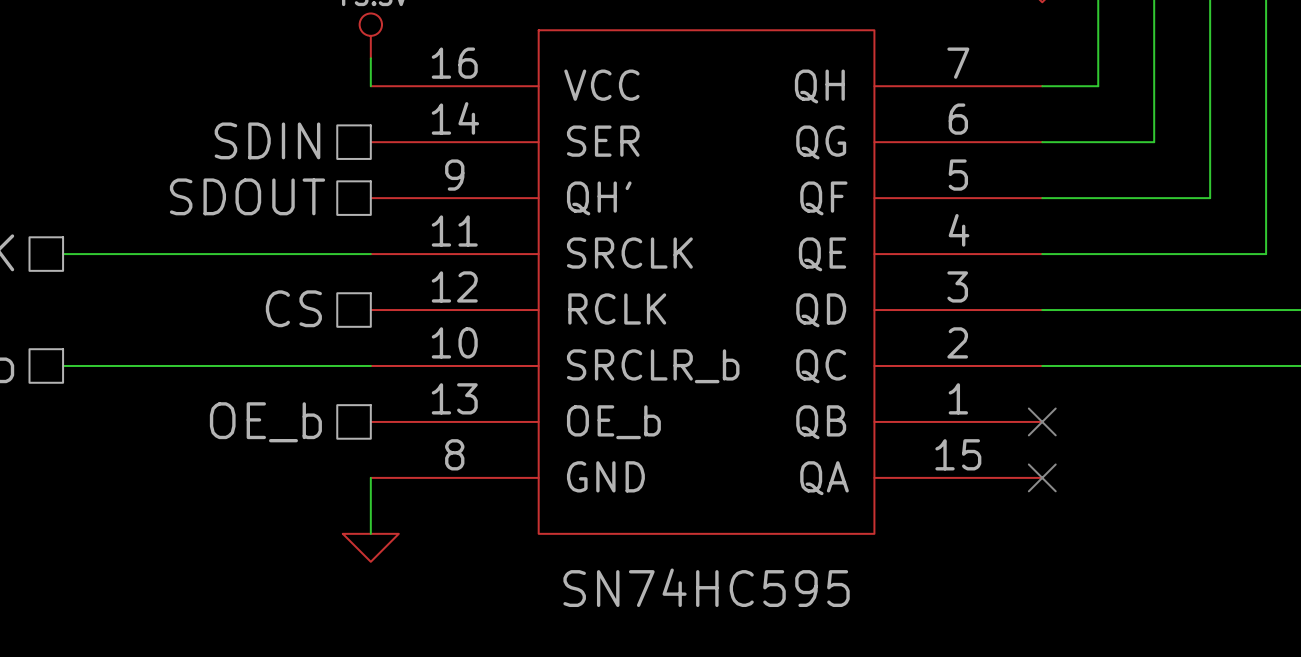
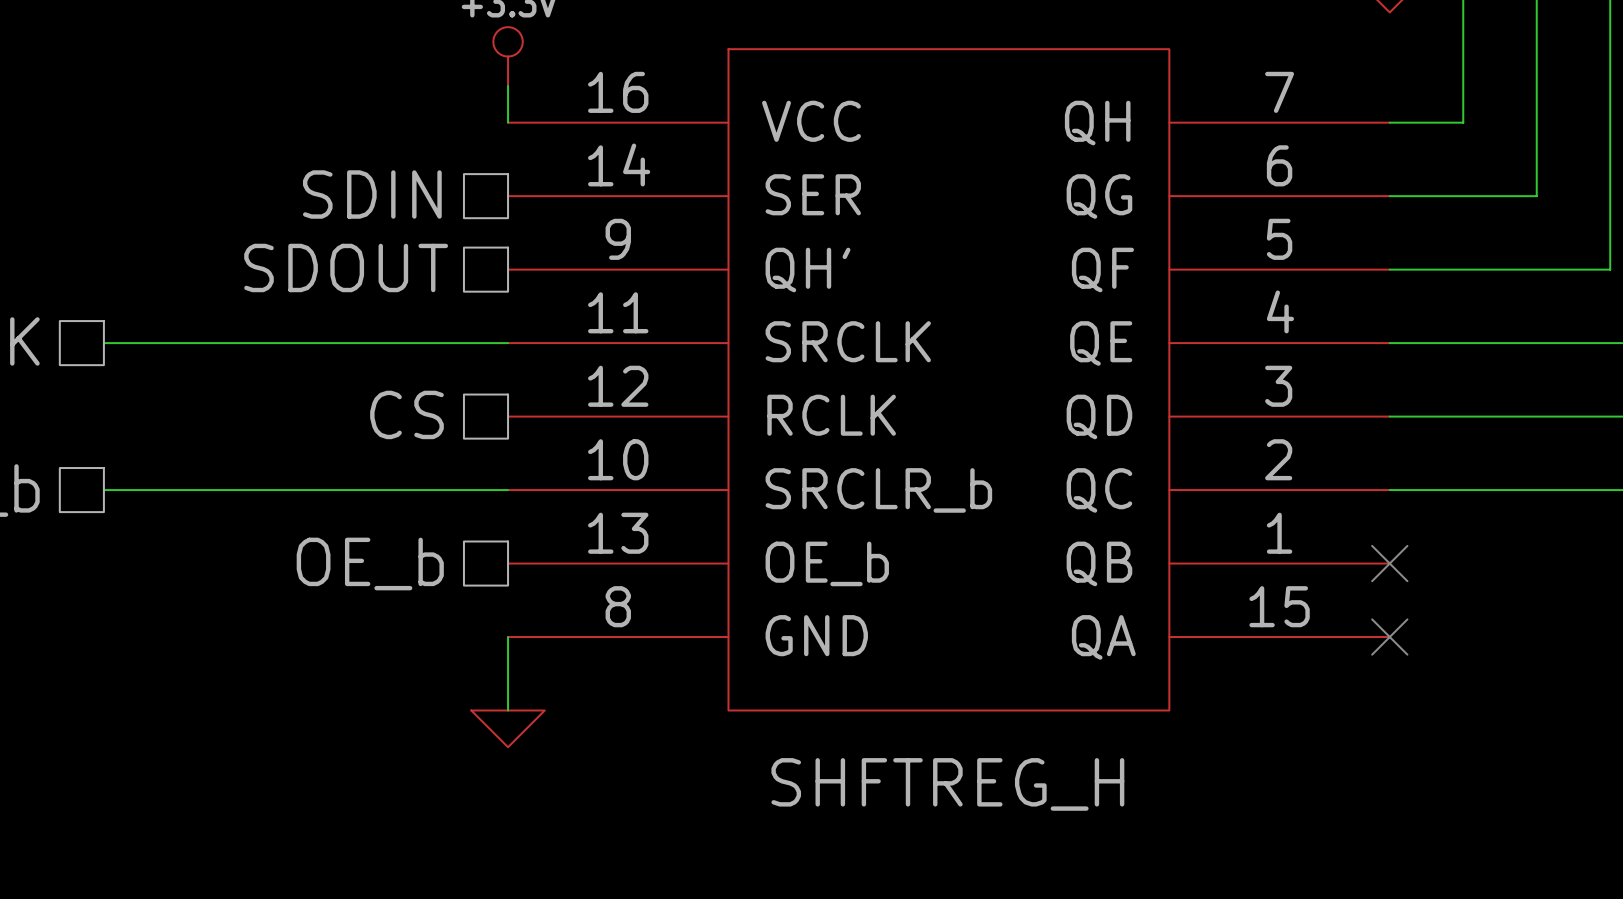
part value: SN74HC595 (706, 587) -> SHFTREG_H (947, 784)

